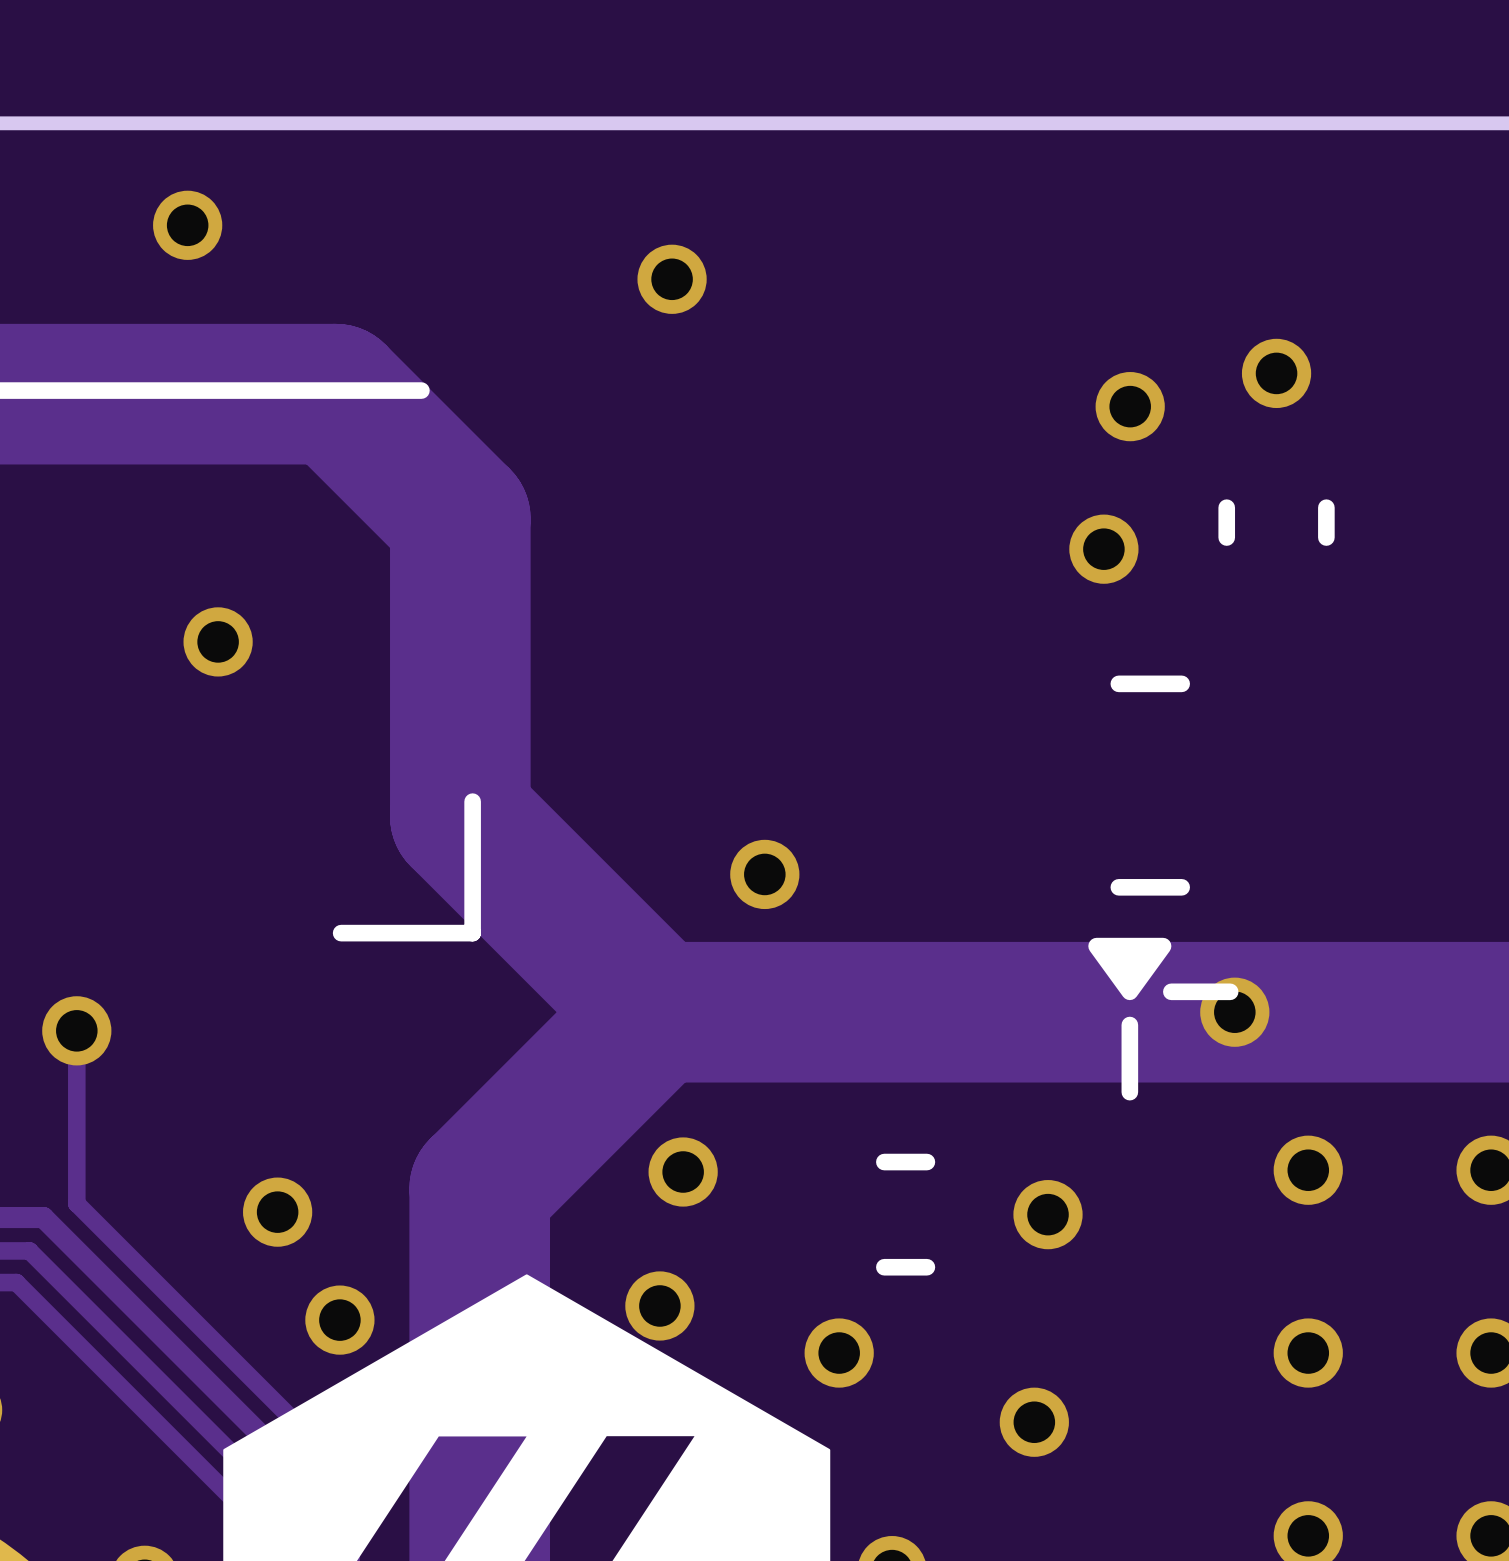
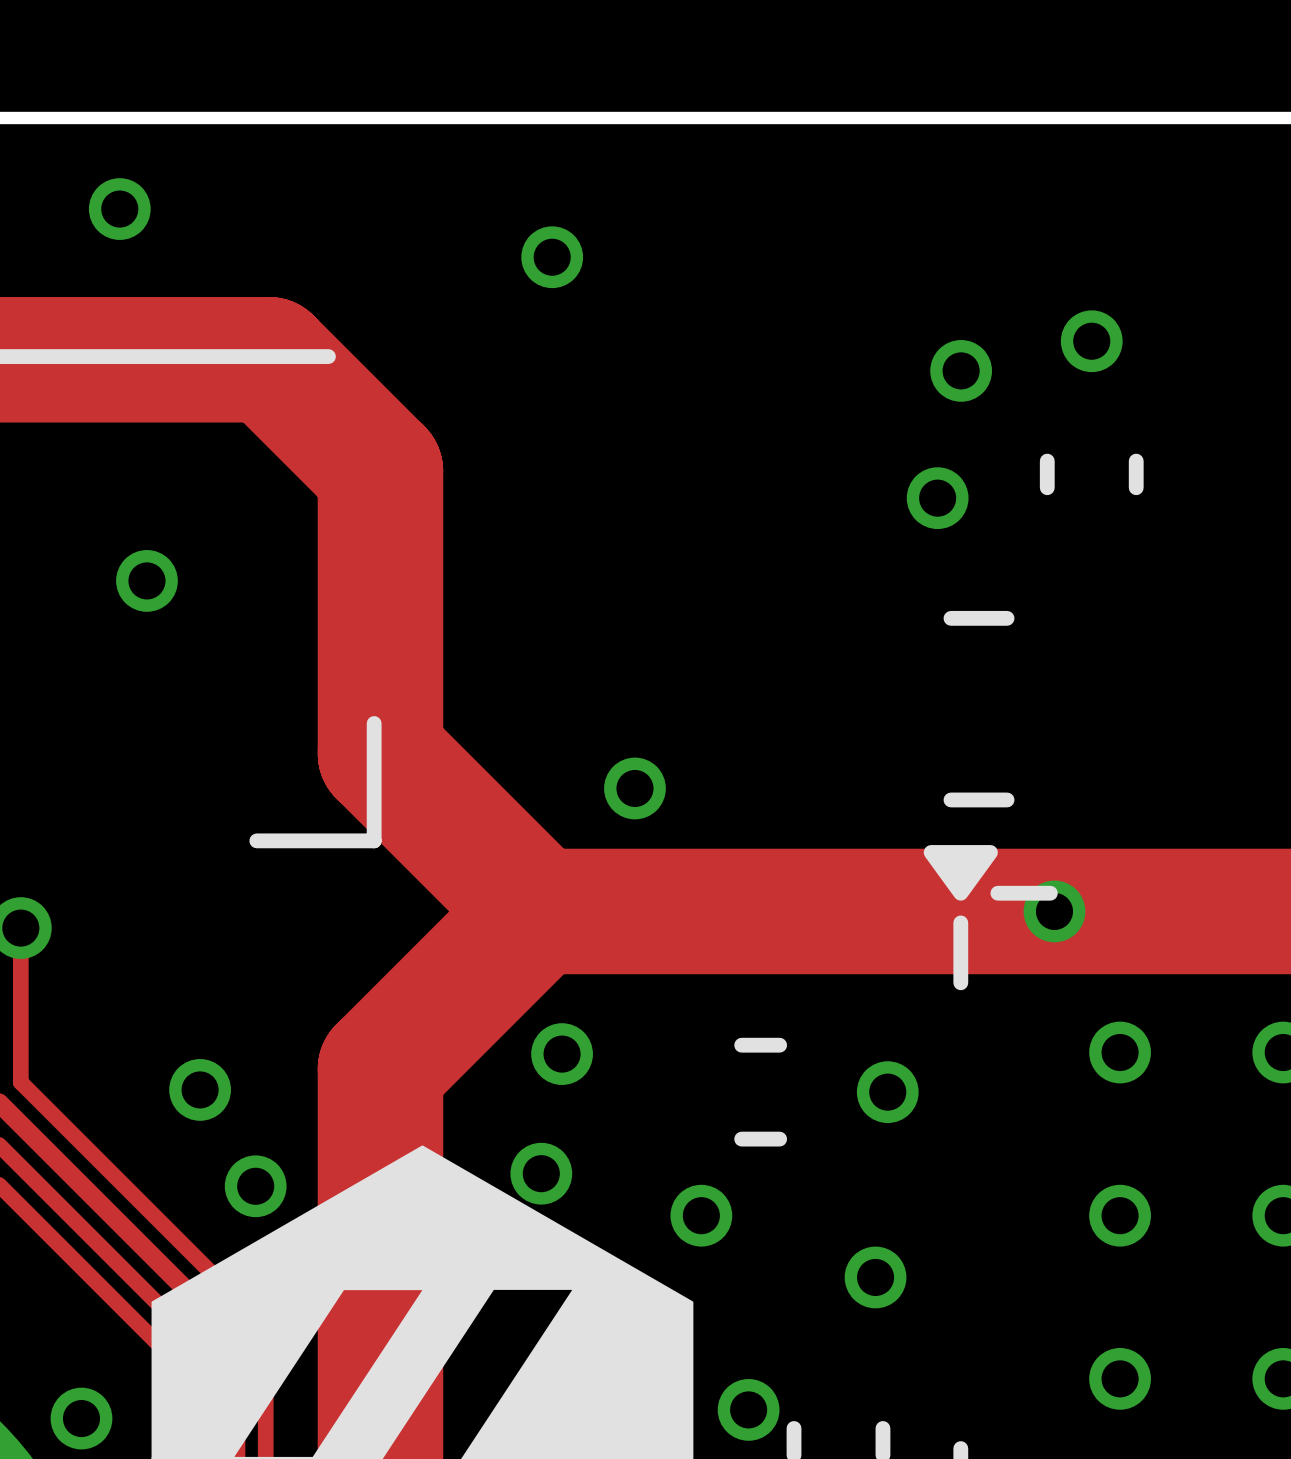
track: (335, 394) (460, 518) (460, 816) (479, 835) -> (251, 359) (269, 359) (380, 470) (380, 754)

